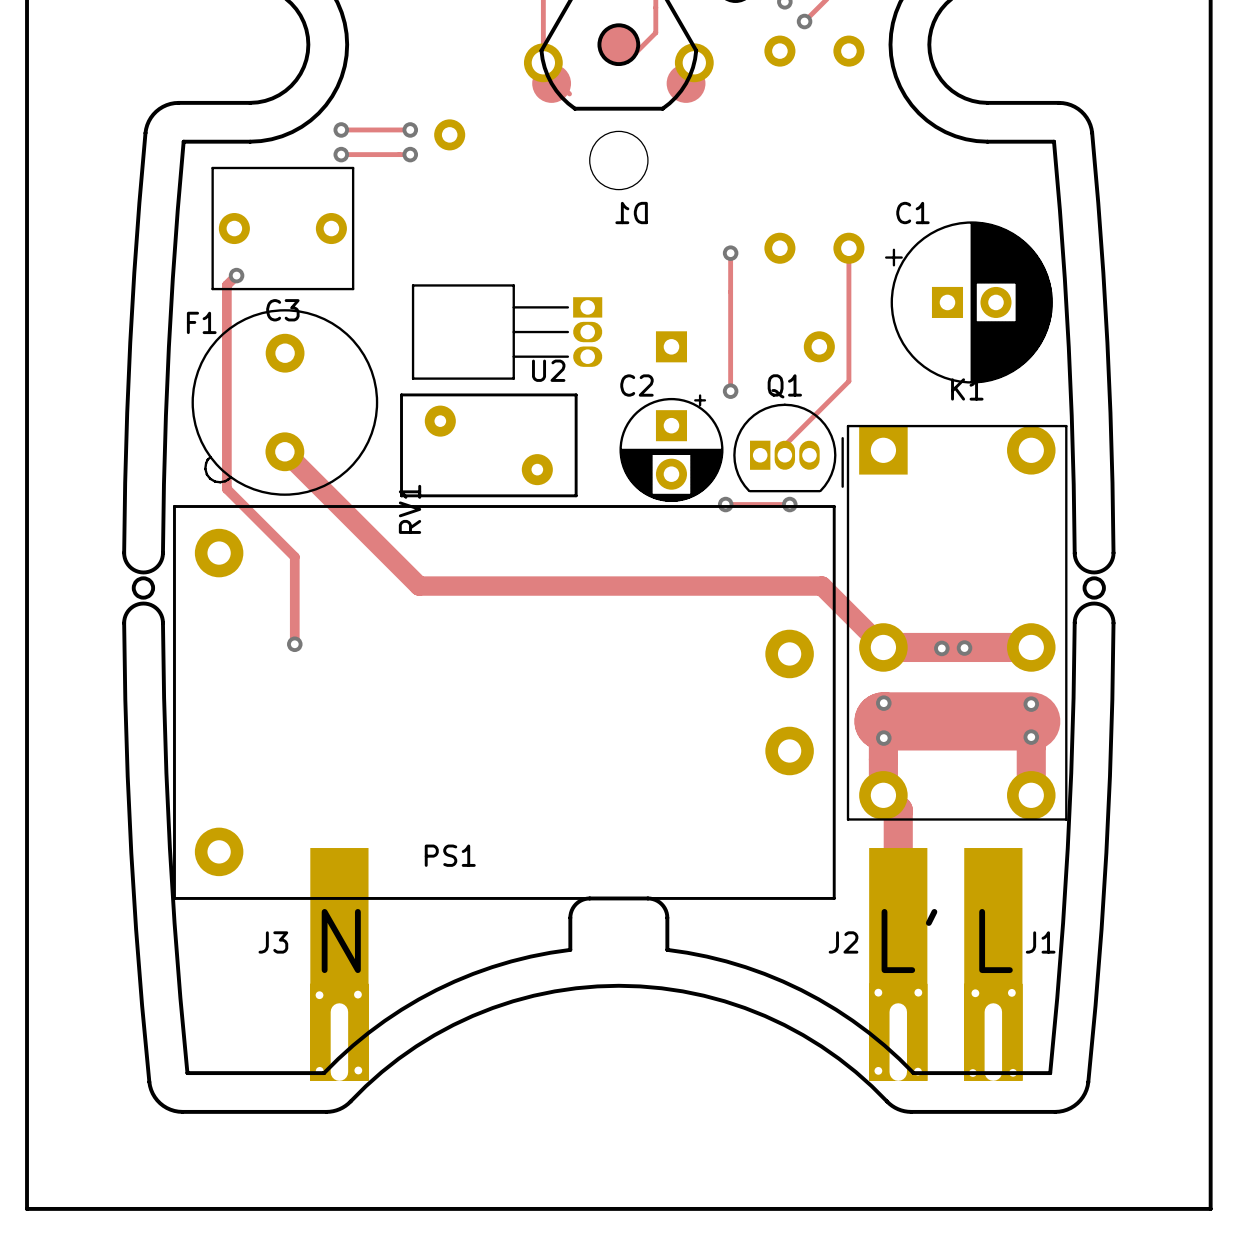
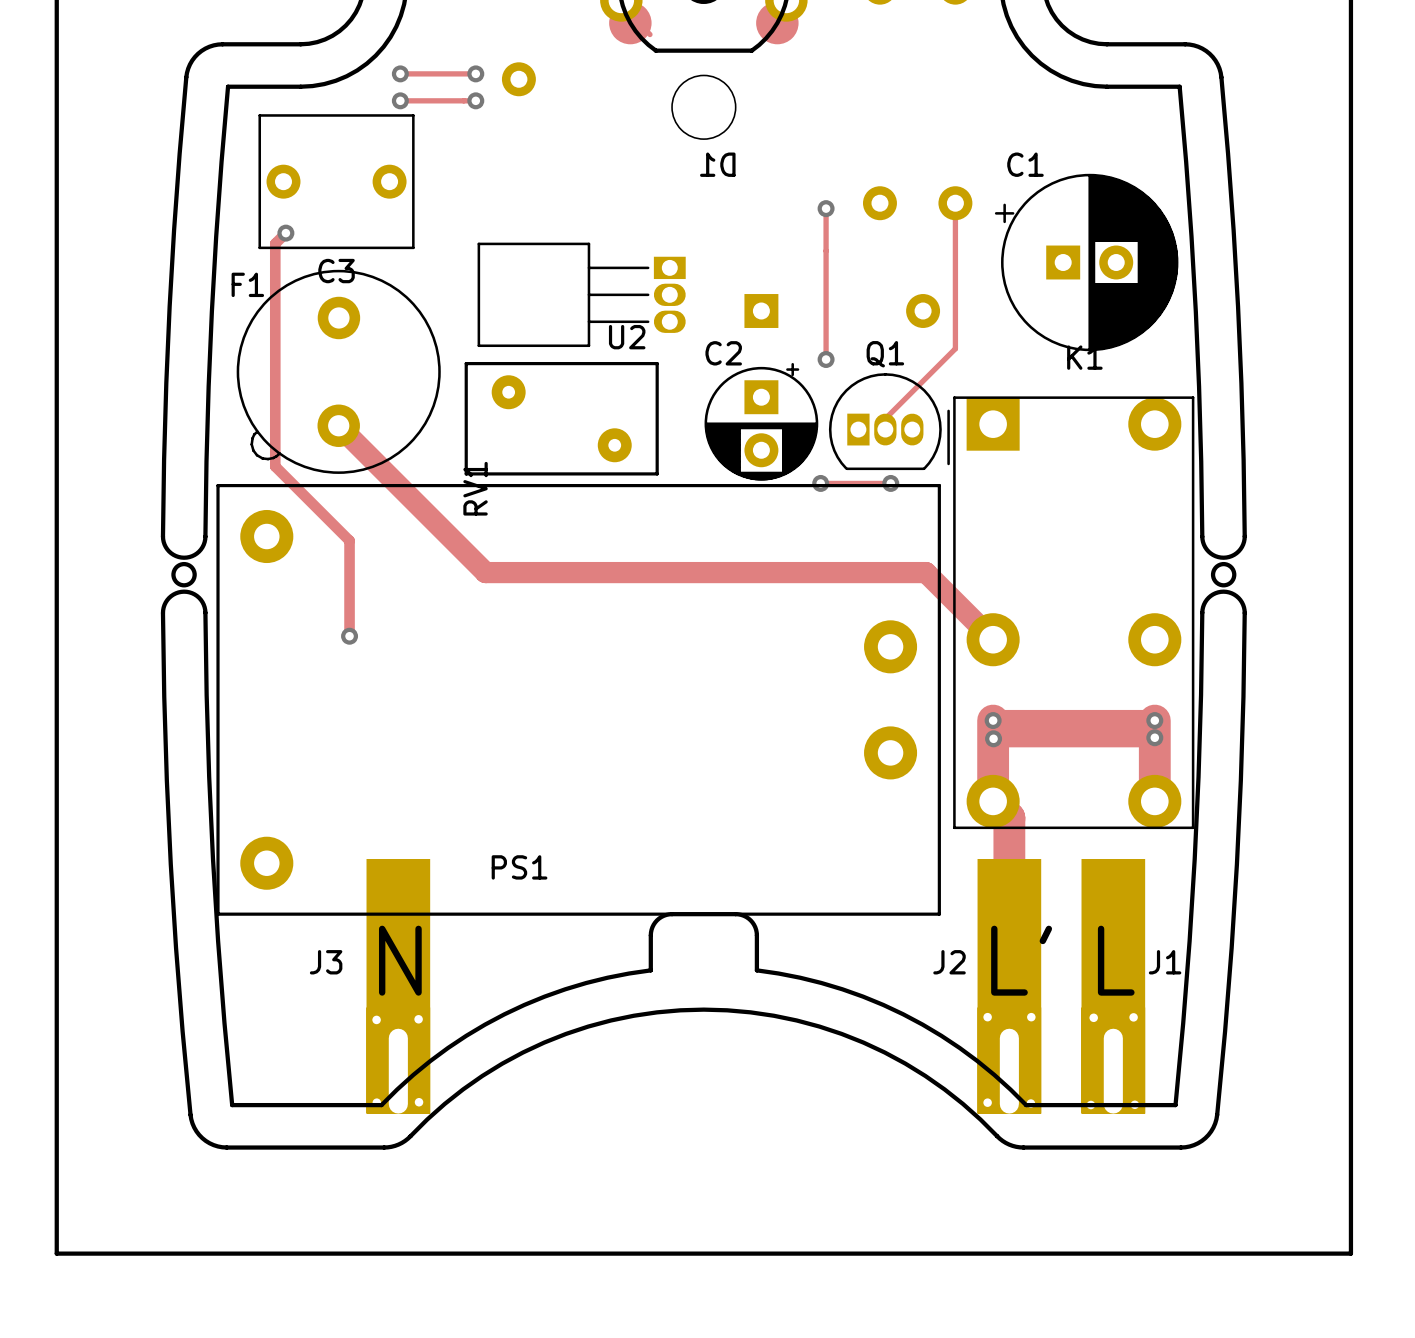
track: (883, 647) (1031, 647) -> (993, 736) (1154, 736)
via: (941, 648) -> none
via: (964, 648) -> none
via position: (883, 703) -> (993, 720)
via position: (1031, 704) -> (1154, 720)
track width: thick (883, 721) (1031, 721) -> thin (993, 720) (1154, 720)

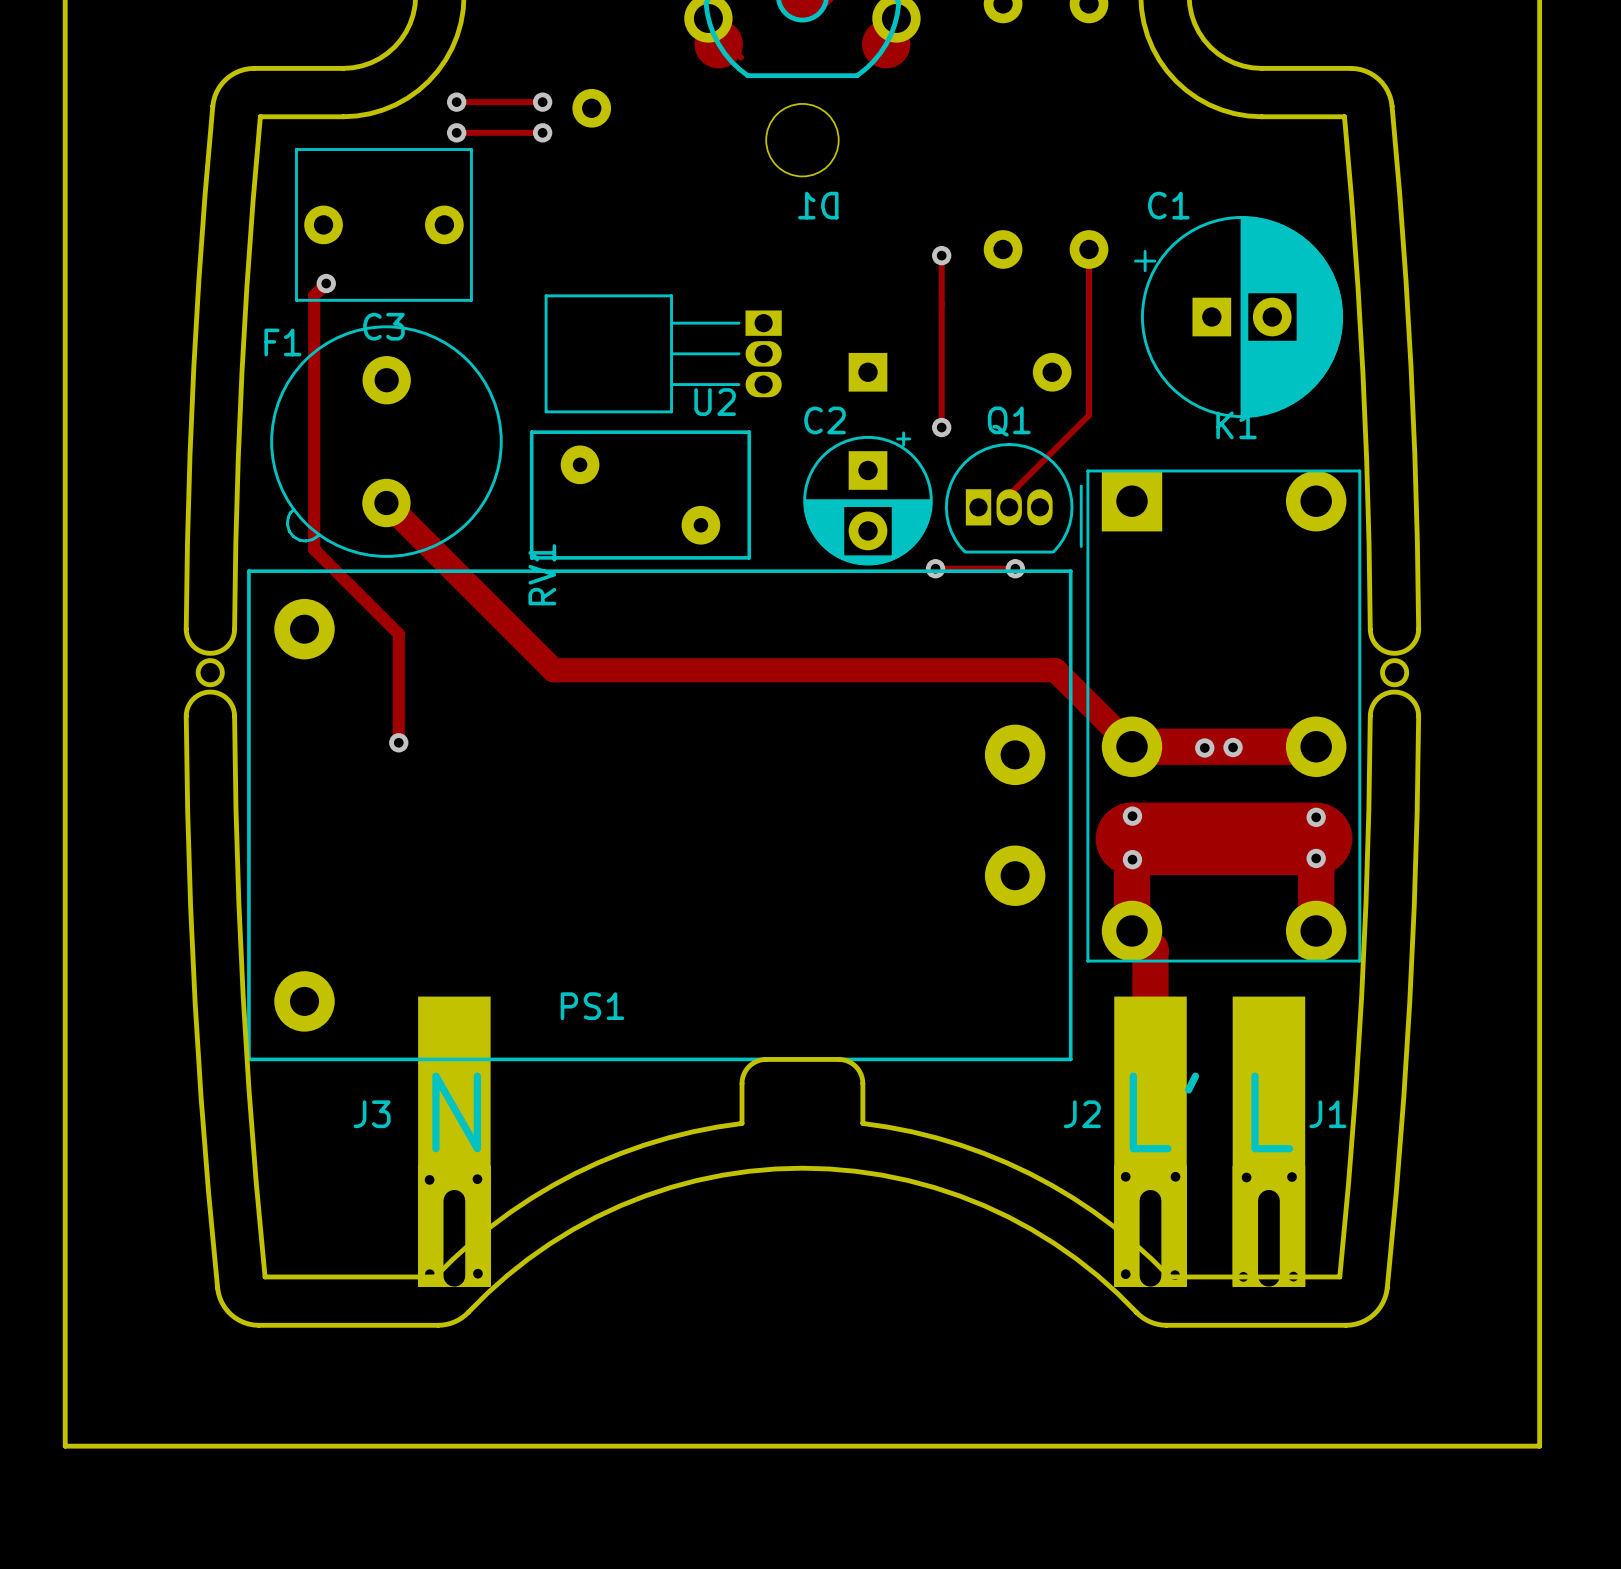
via: none -> (1204, 747)
via: none -> (1233, 747)
track width: thin (993, 720) (1154, 720) -> thick (1132, 838) (1316, 838)
via position: (993, 720) -> (1132, 816)
via position: (1154, 720) -> (1316, 817)
track: (993, 736) (1154, 736) -> (1132, 746) (1316, 746)

